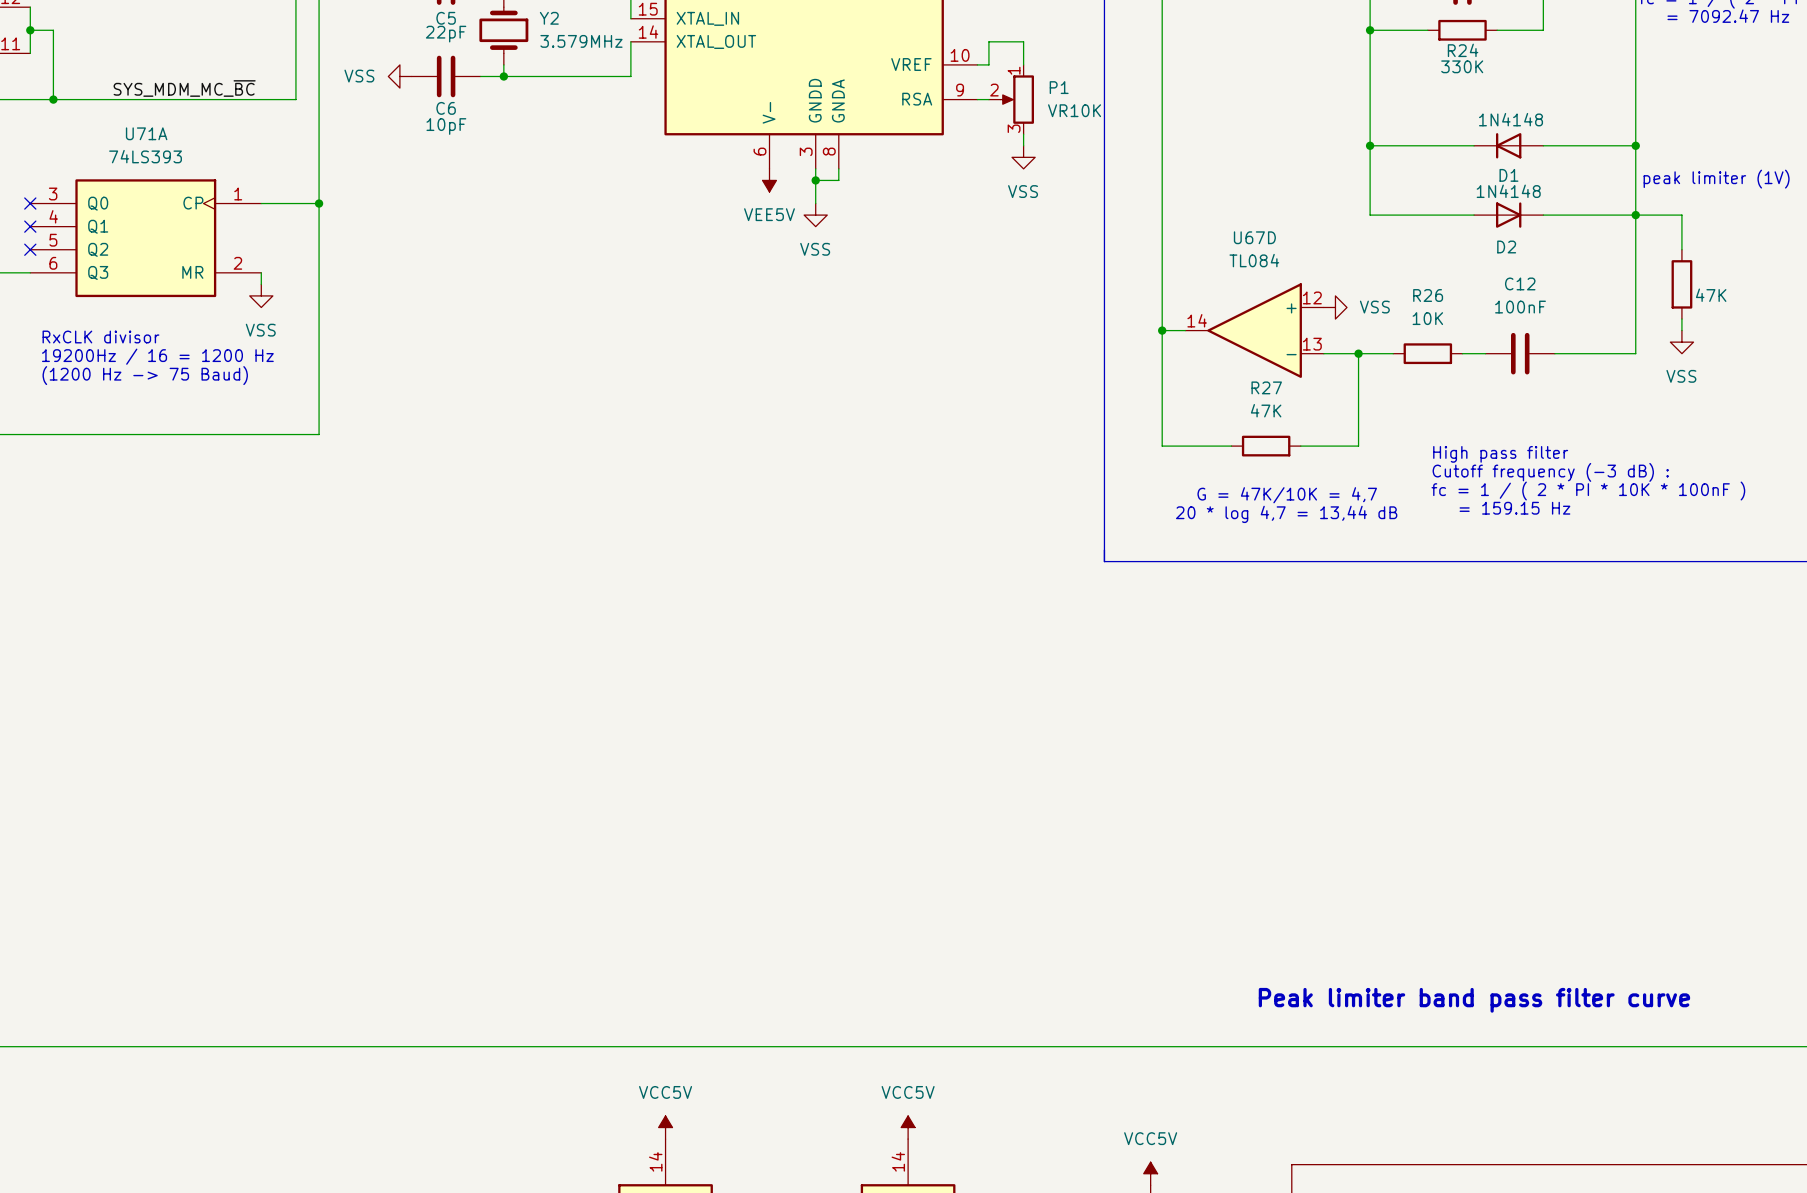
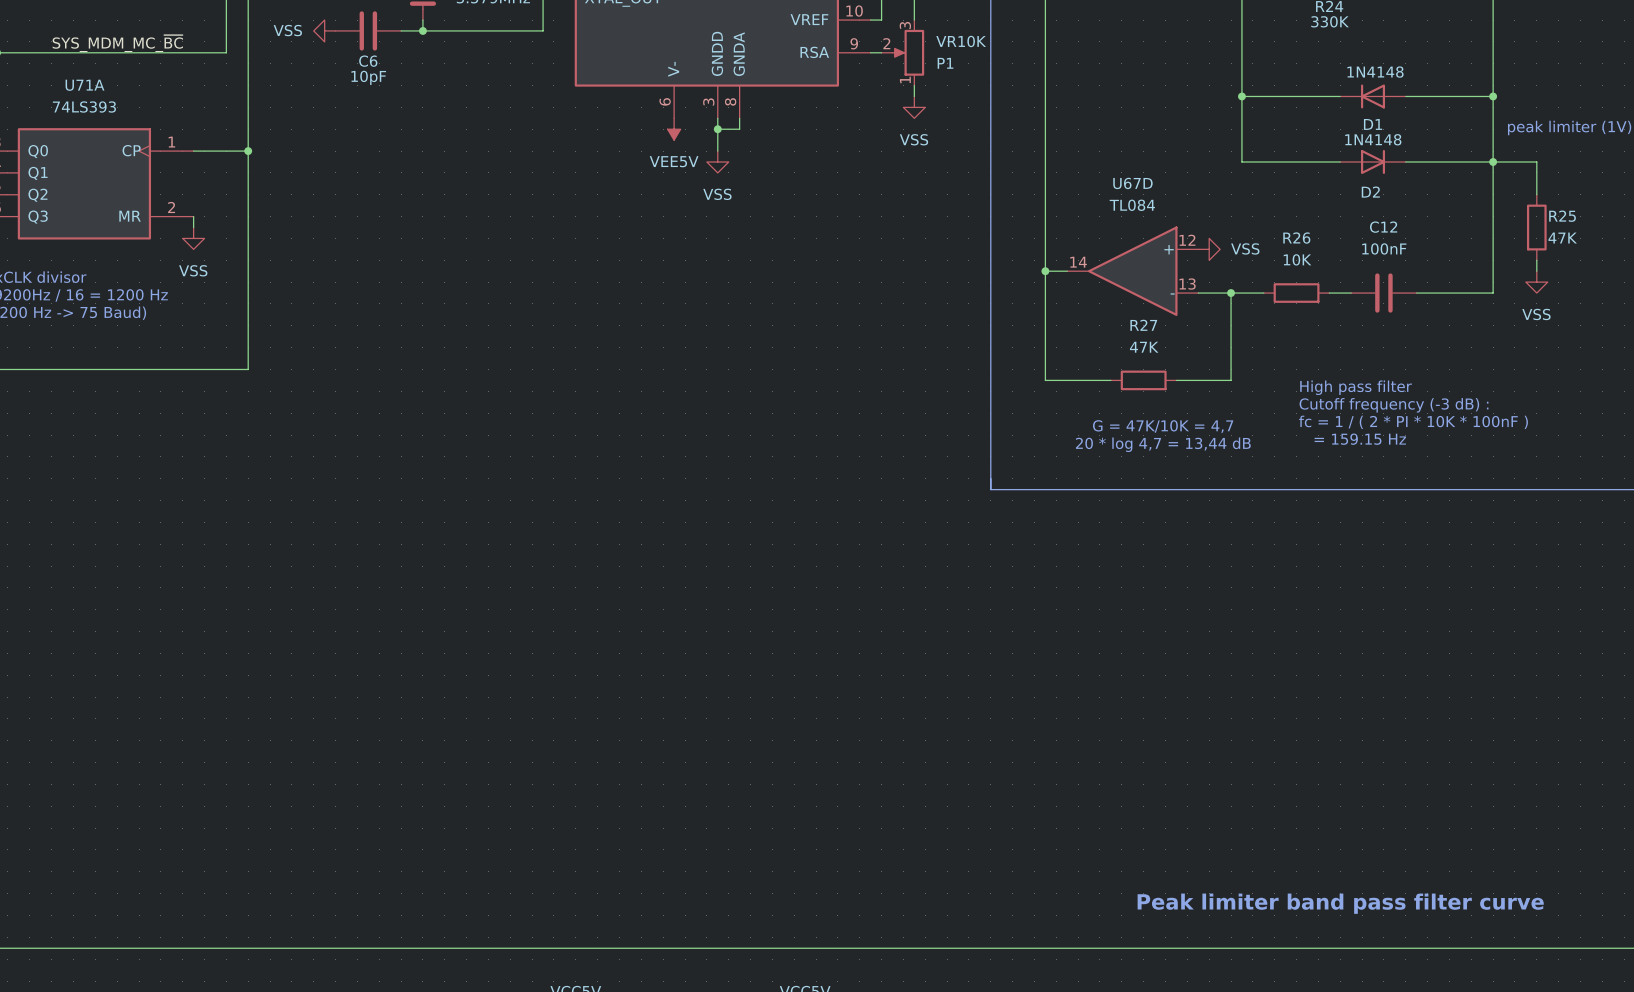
P1 flip: as is (1017, 99) -> up-down (908, 52)
R25 name: none -> R25 (1562, 216)

